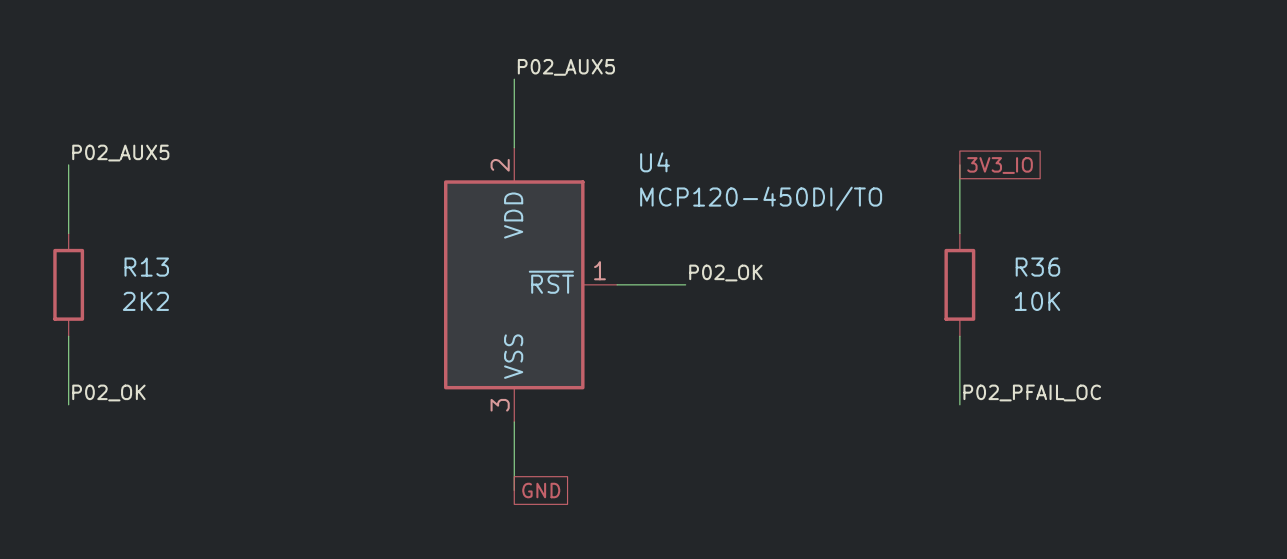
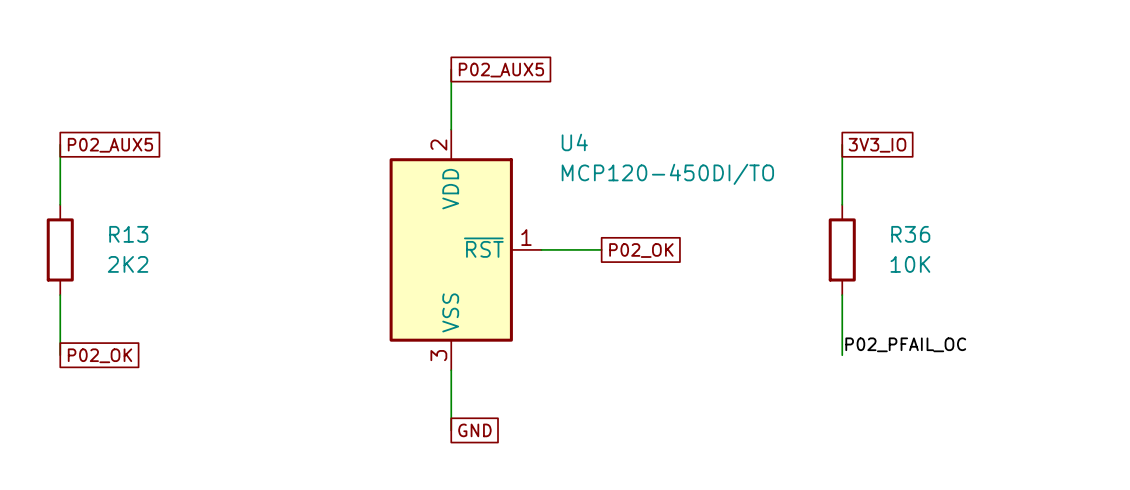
label: P02_AUX5 (566, 67) -> none
global label: none -> P02_AUX5 (501, 70)
label: P02_AUX5 (120, 153) -> none
global label: none -> P02_AUX5 (110, 145)
label: P02_OK (725, 273) -> none
global label: none -> P02_OK (641, 250)
label: P02_OK (108, 392) -> none
global label: none -> P02_OK (100, 355)

